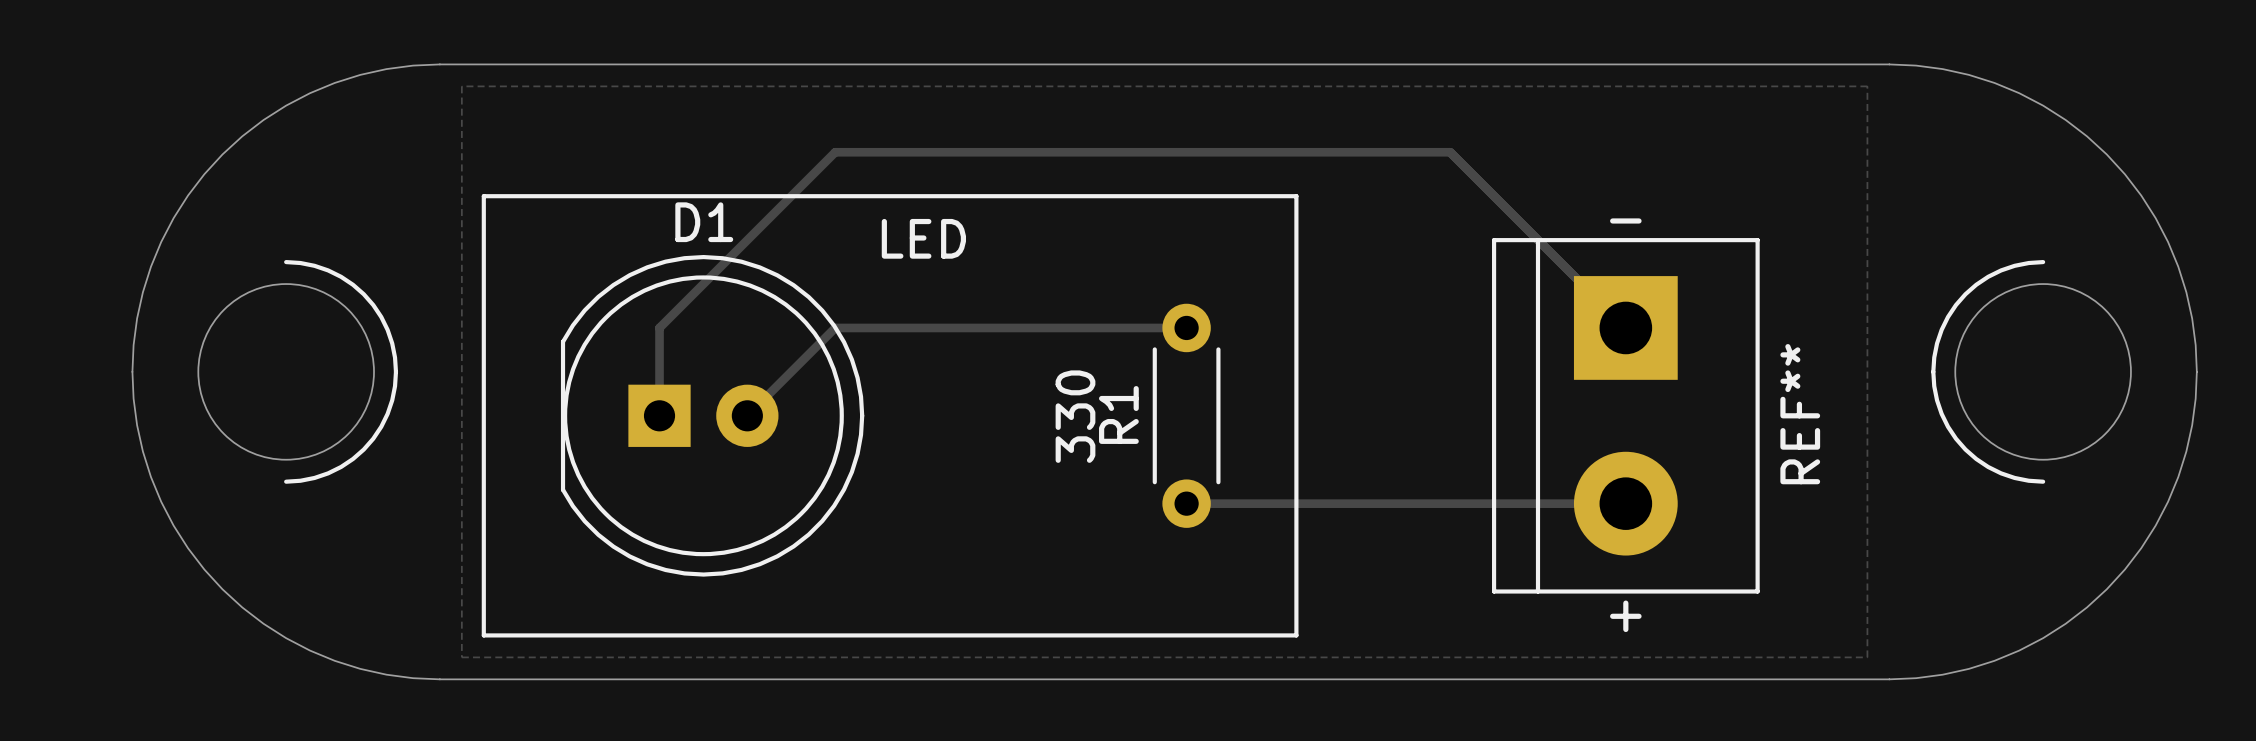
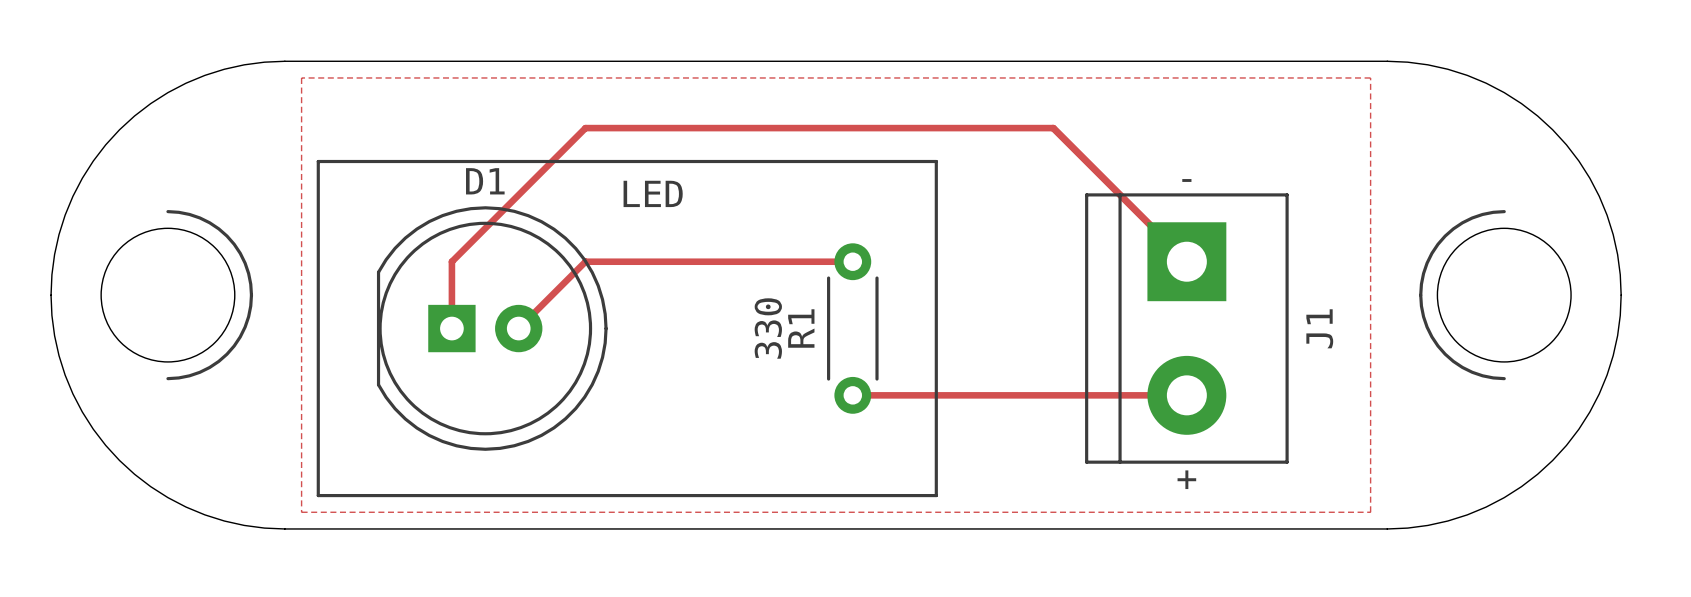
REF** name: REF** (1800, 414) -> J1 (1319, 328)

